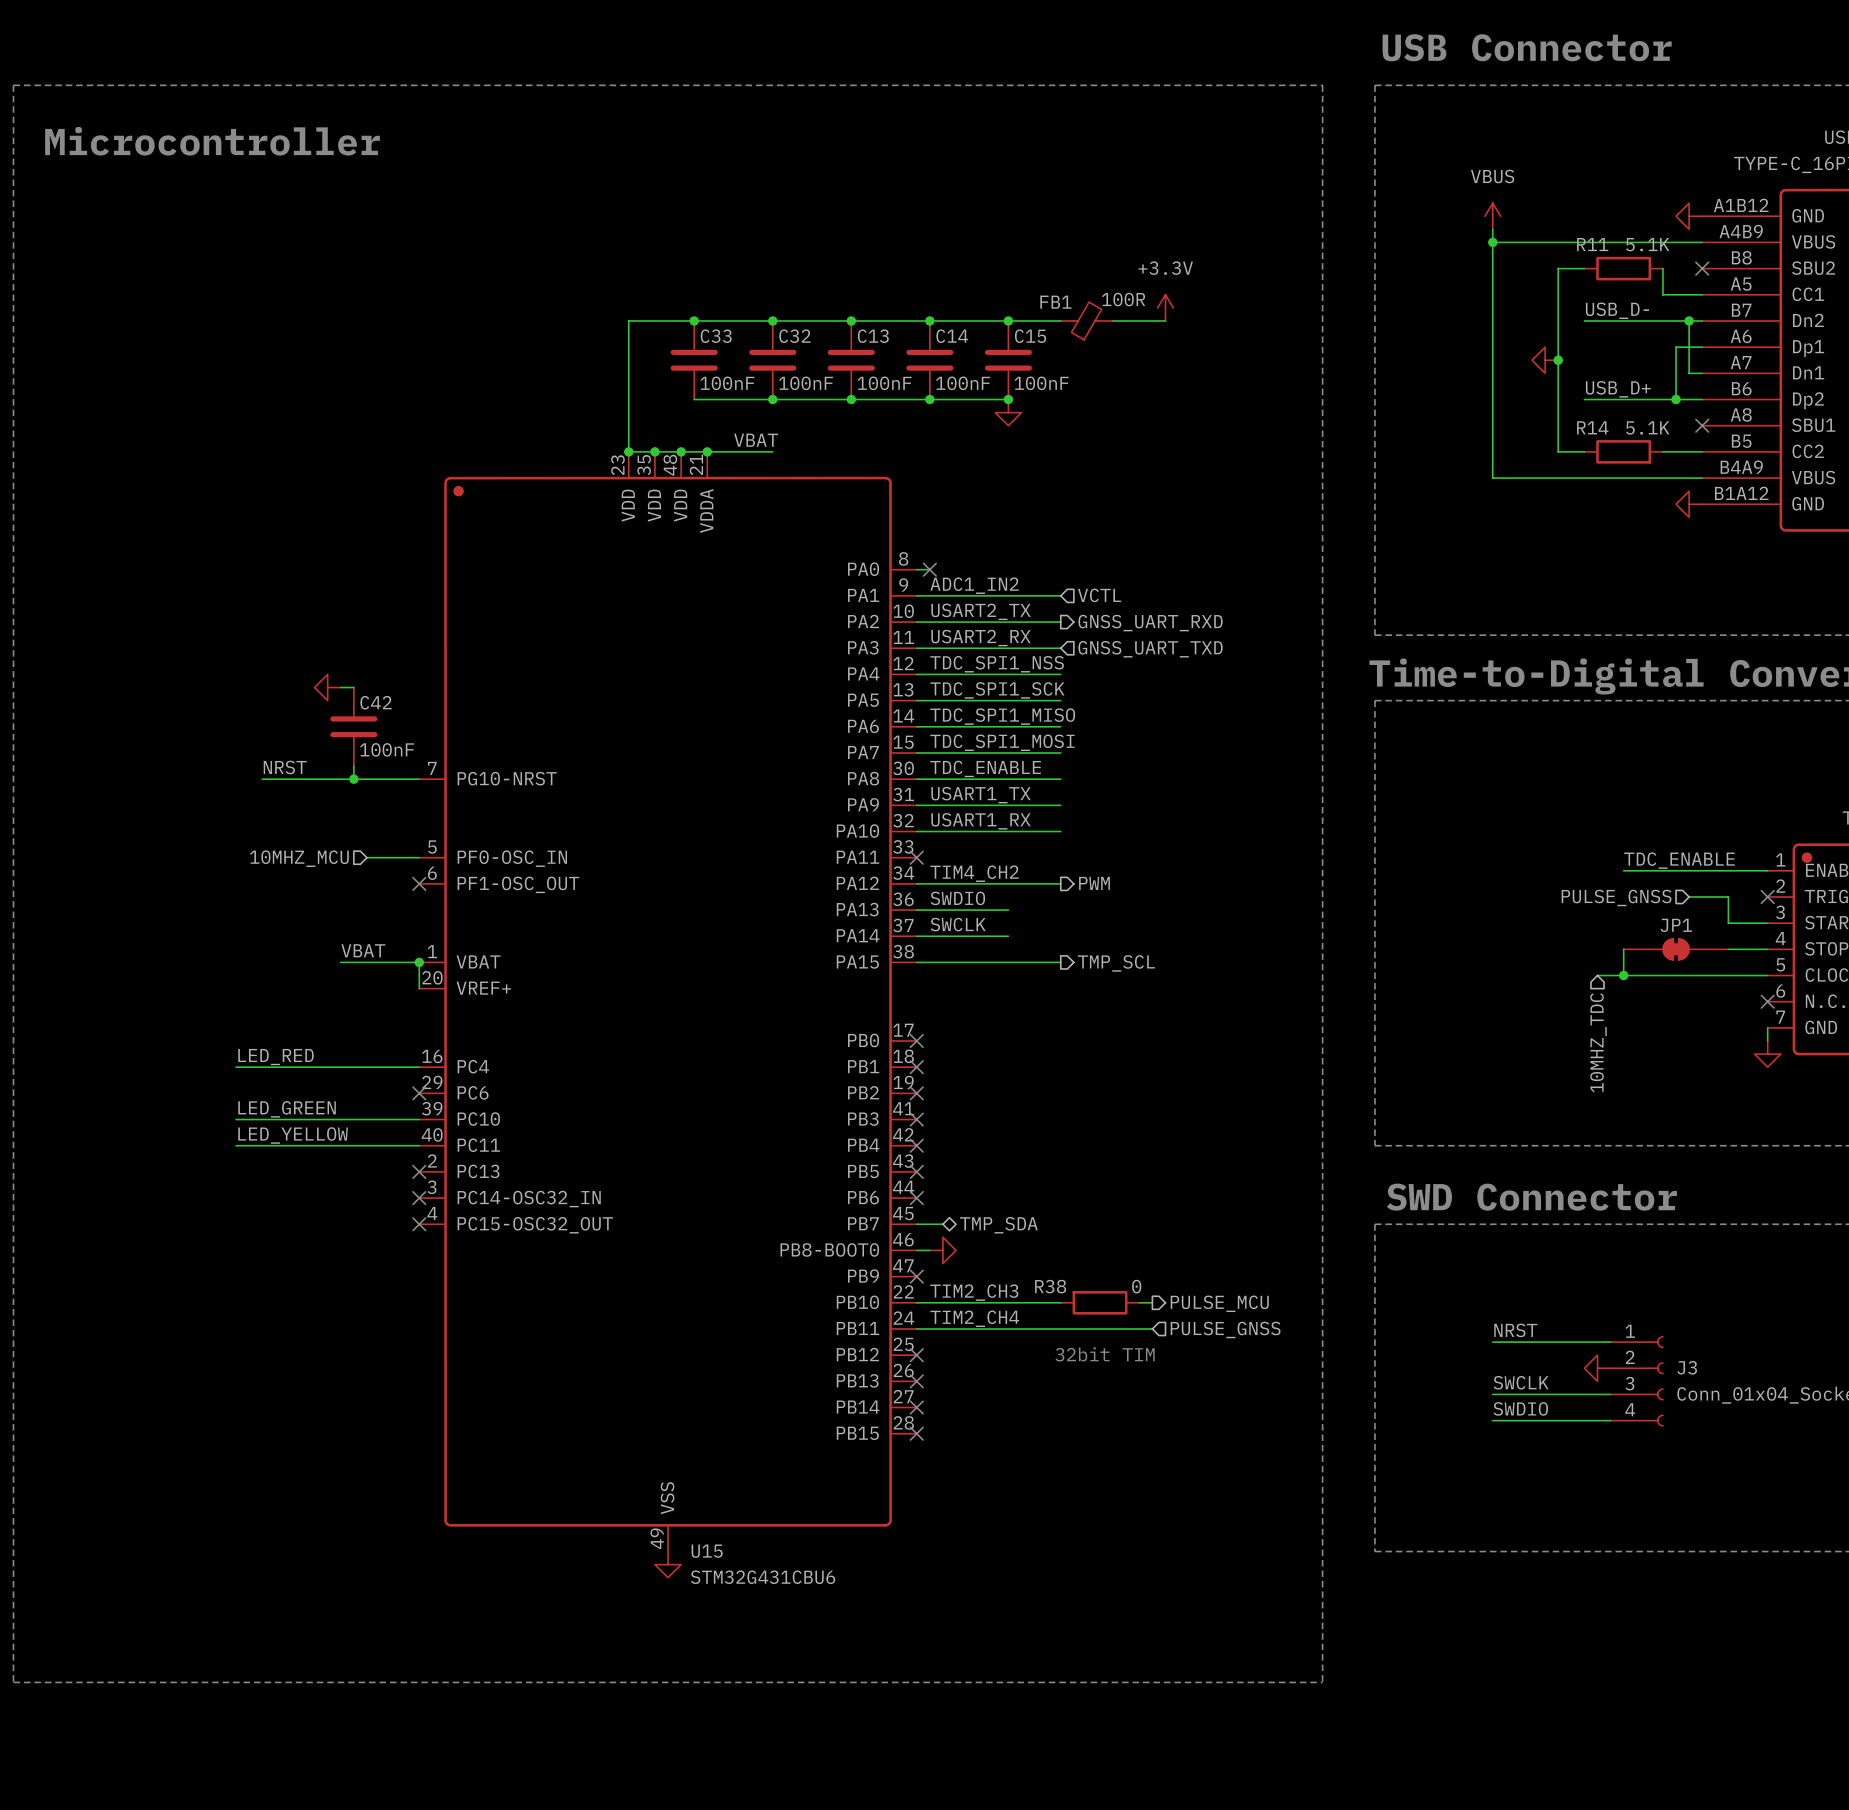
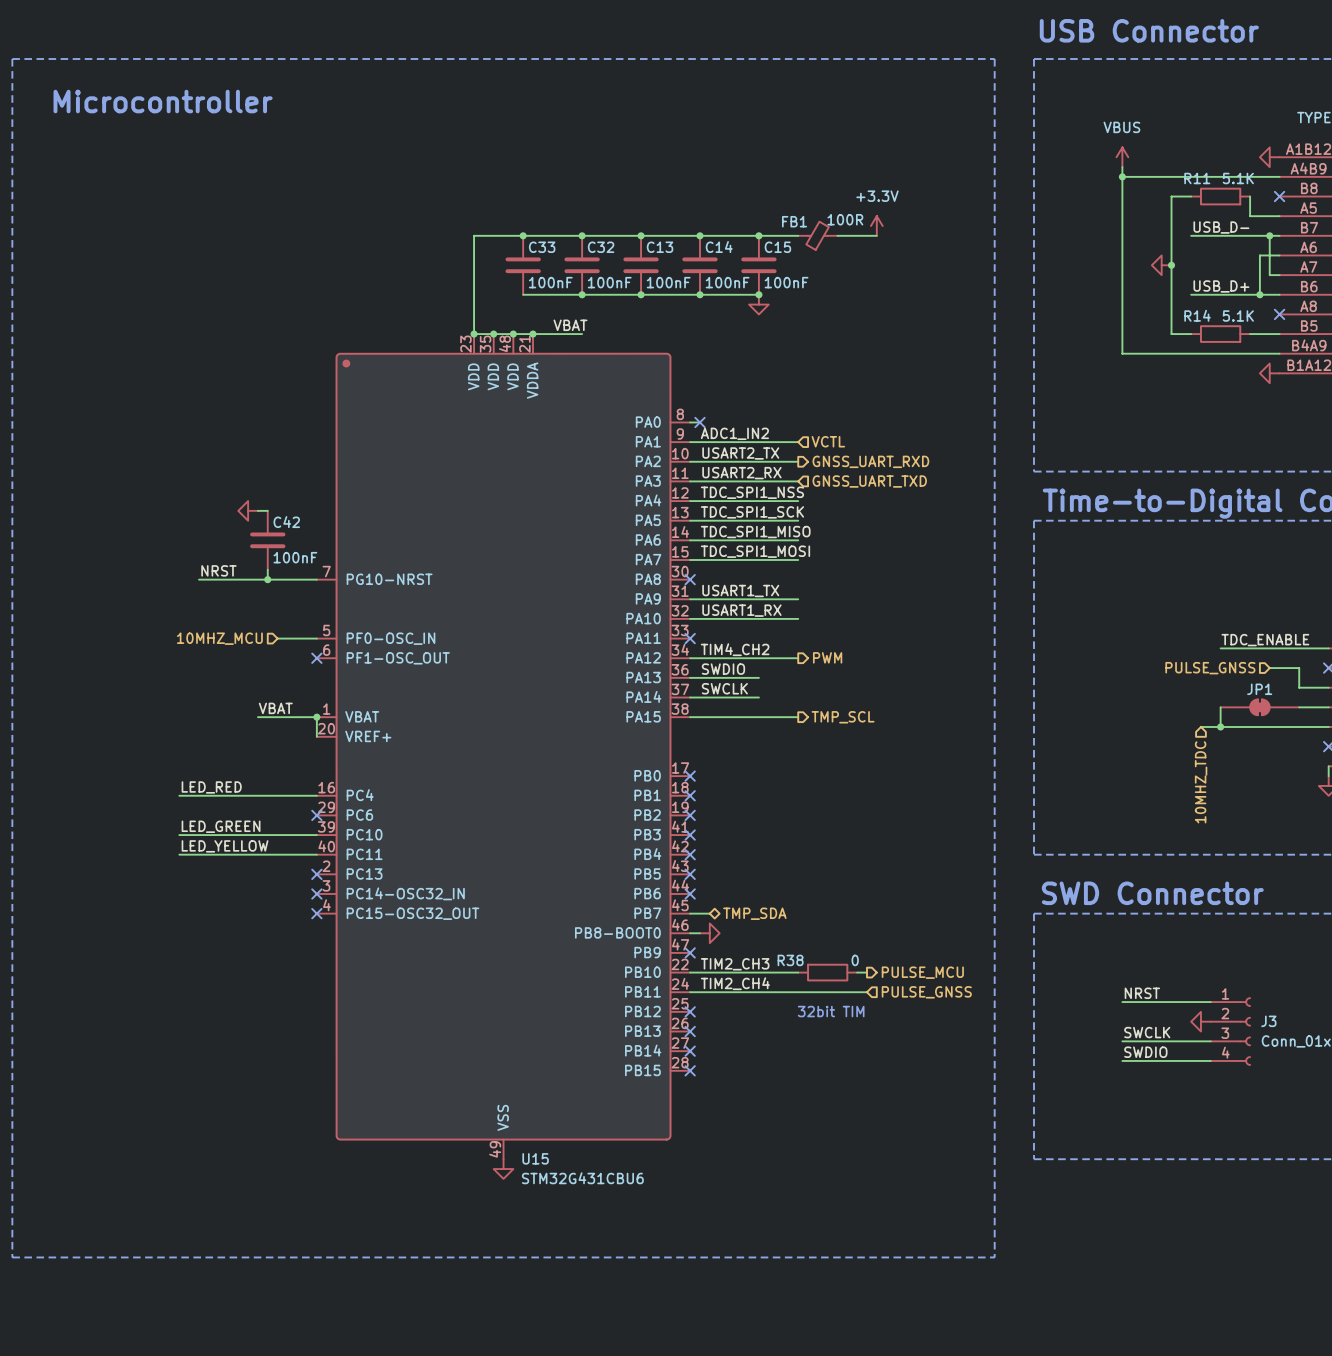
label: TDC_ENABLE (985, 768) -> none
wire: (916, 779) (1060, 779) -> none
no-connect mark: none -> (690, 579)

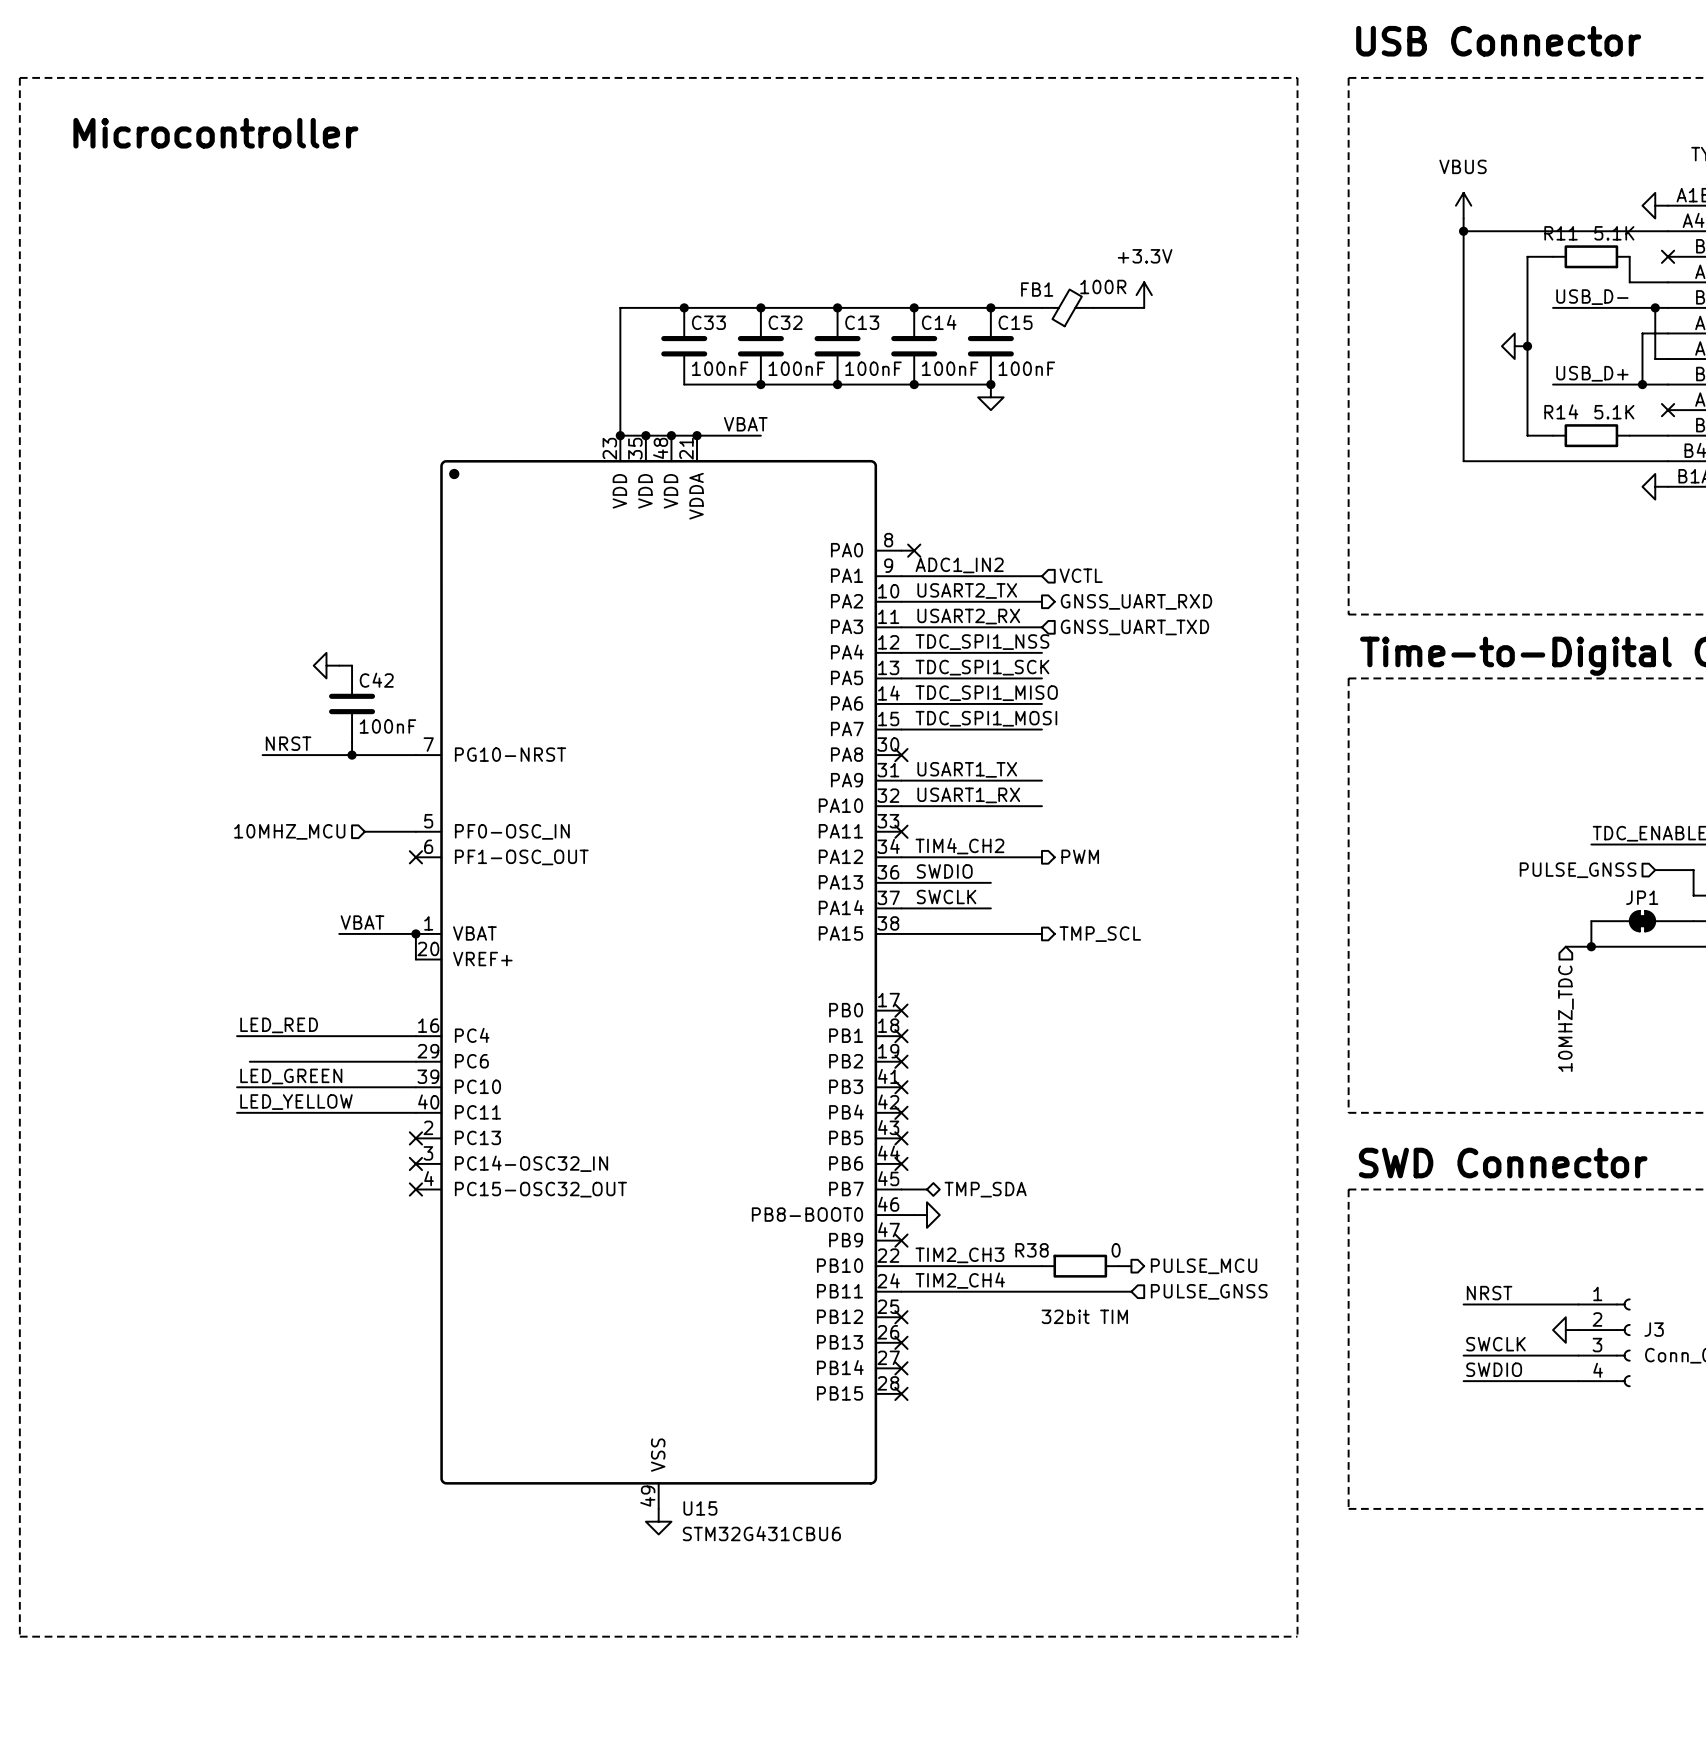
wire: none -> (249, 1061) (415, 1061)
no-connect mark: (316, 815) -> none

